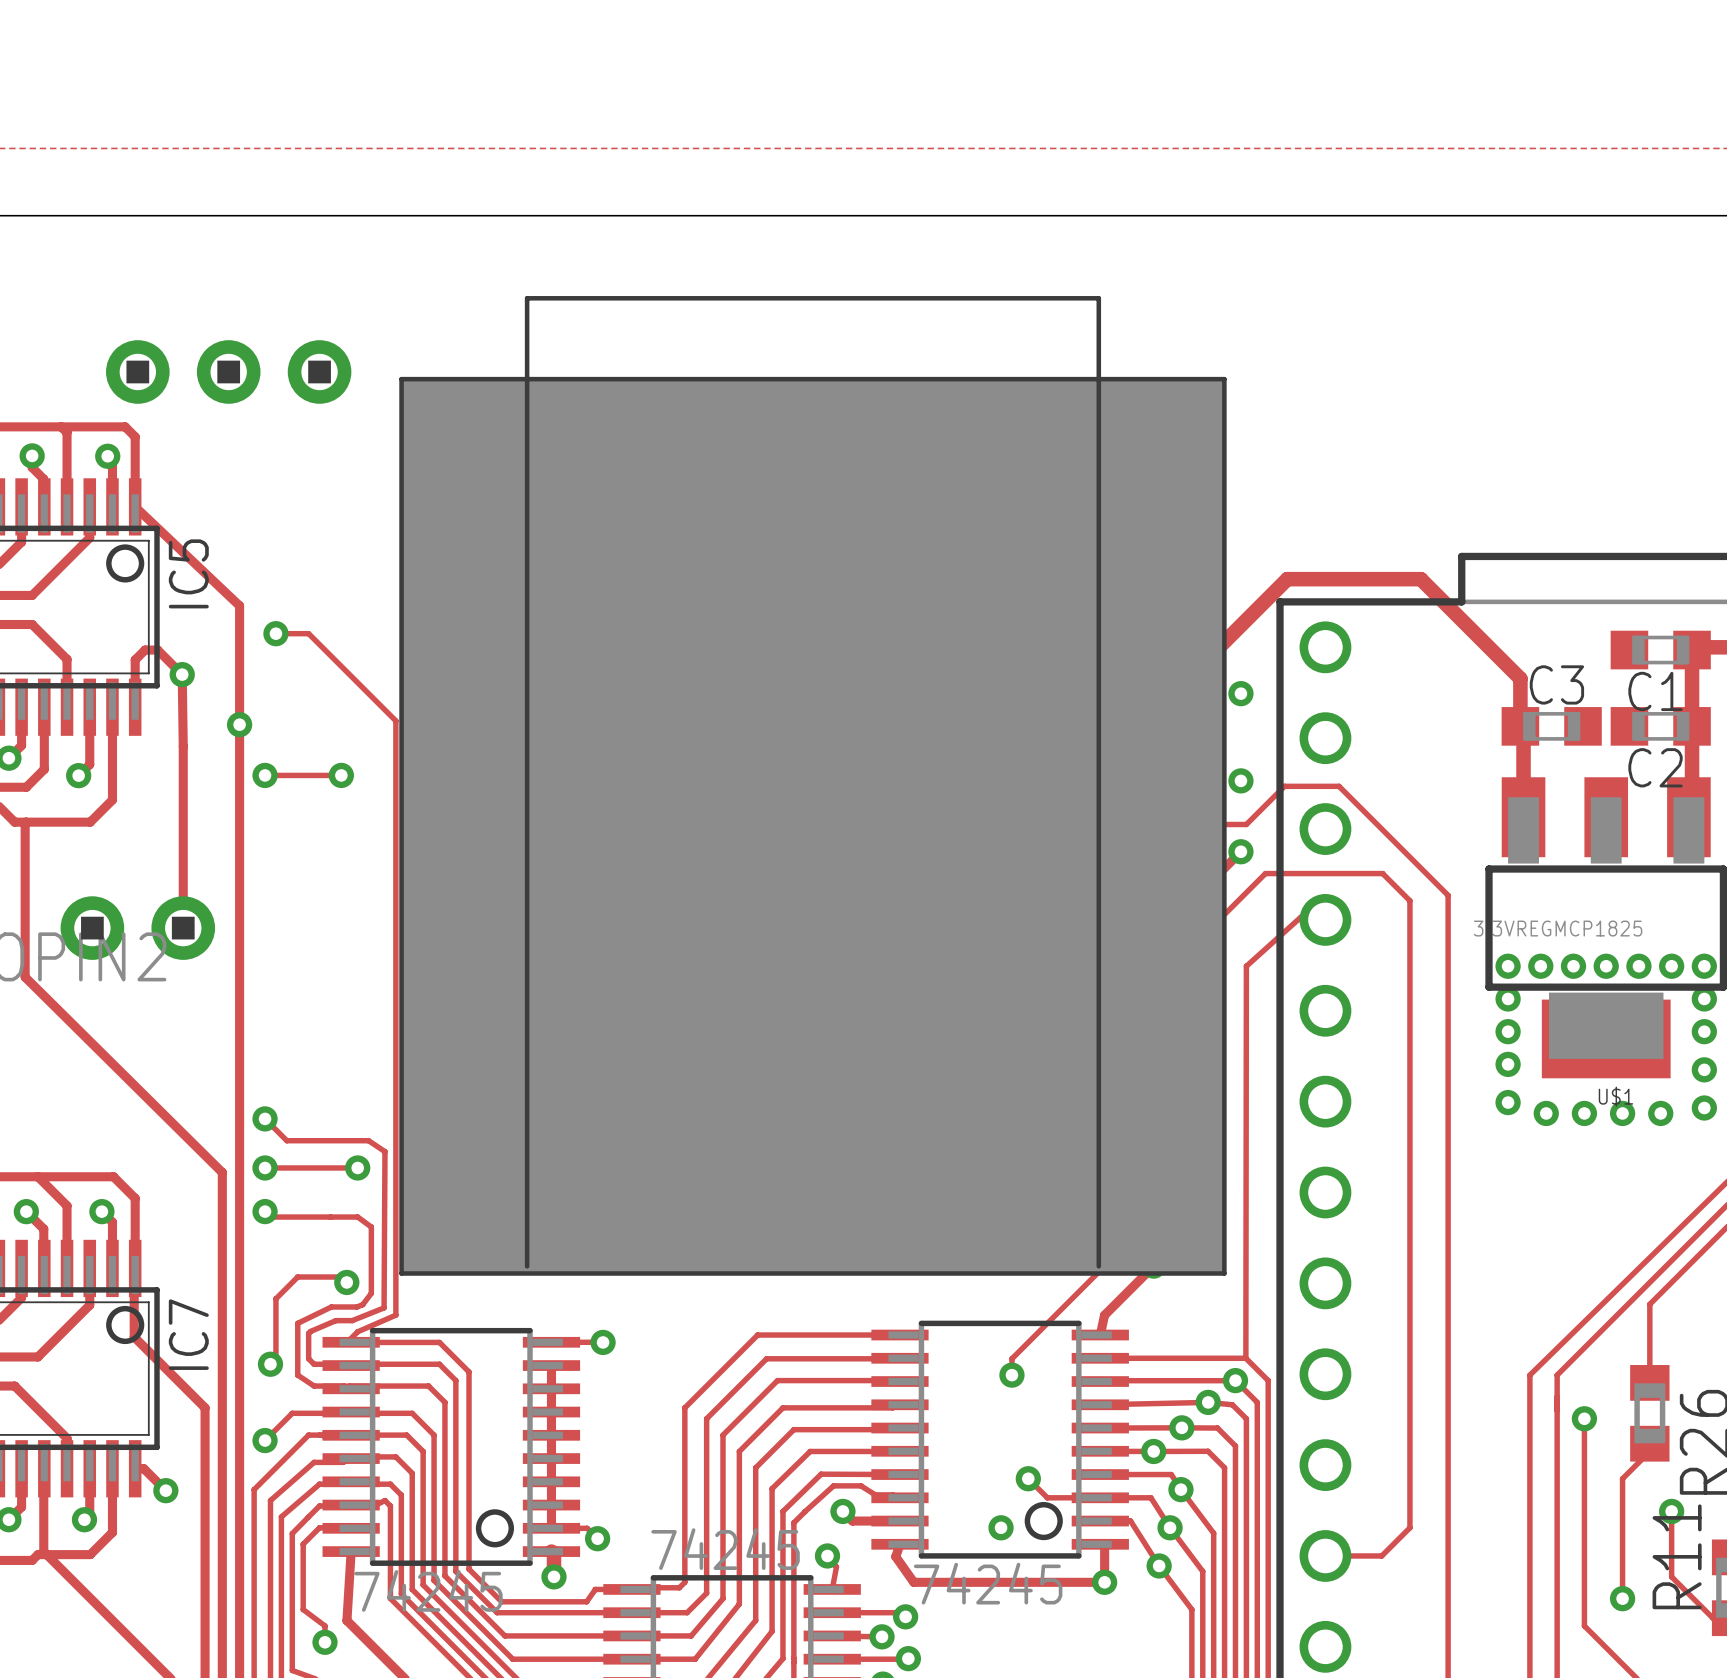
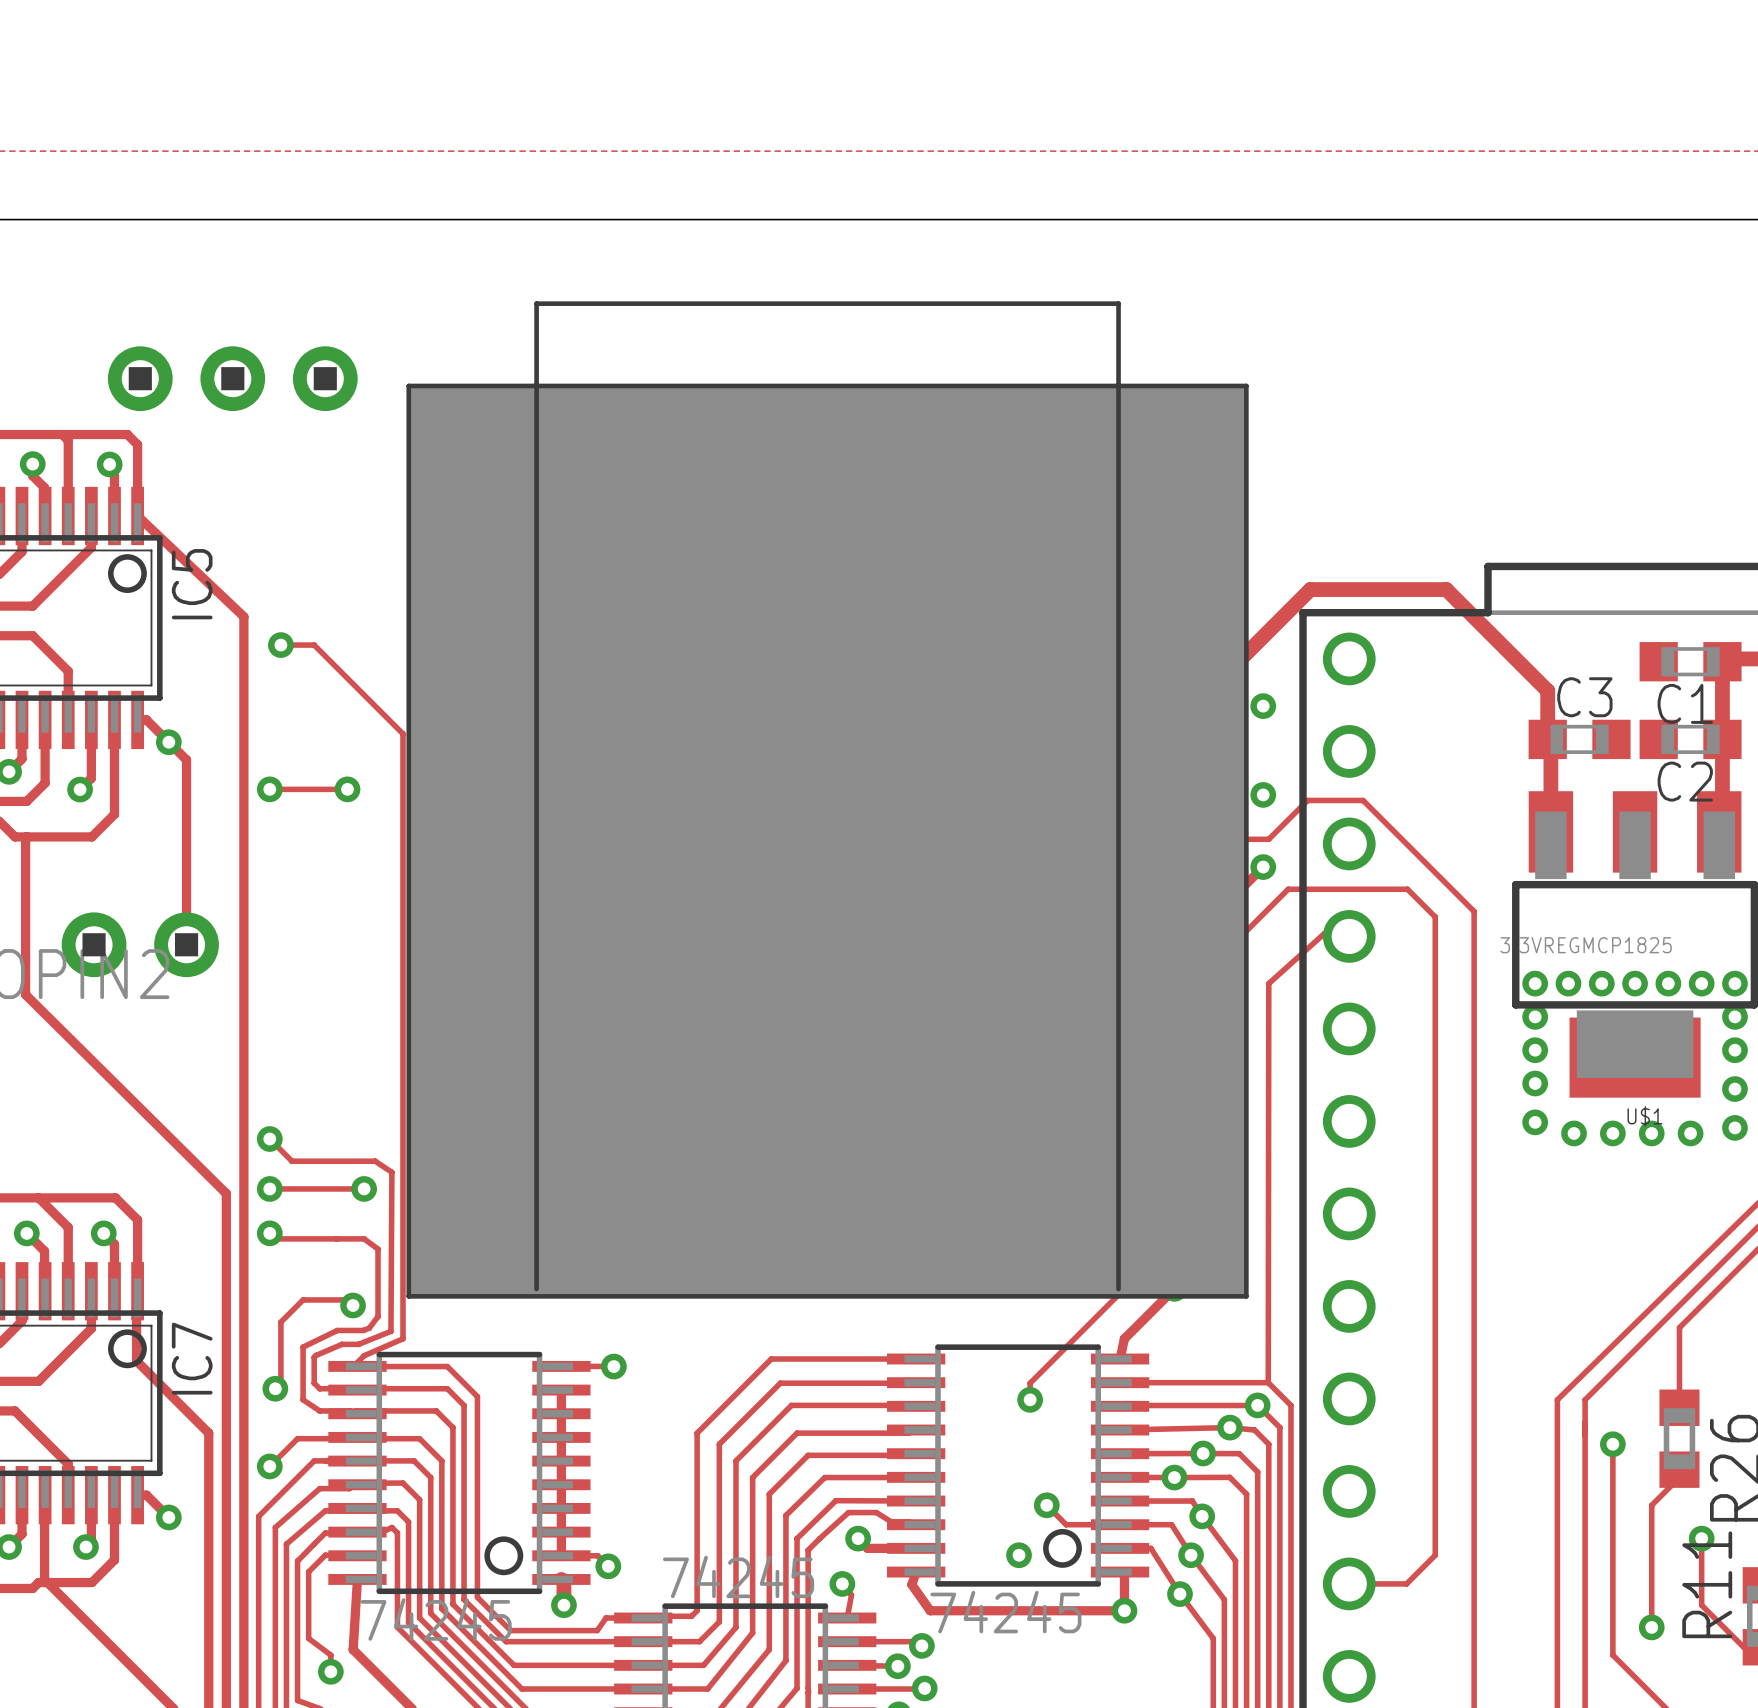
via: (182, 674) -> none
track: (135, 707) (135, 659) (145, 650) (157, 650) (182, 674) (183, 746) -> (137, 719) (146, 719) (186, 759)
via: (239, 724) -> none
via: none -> (168, 742)

